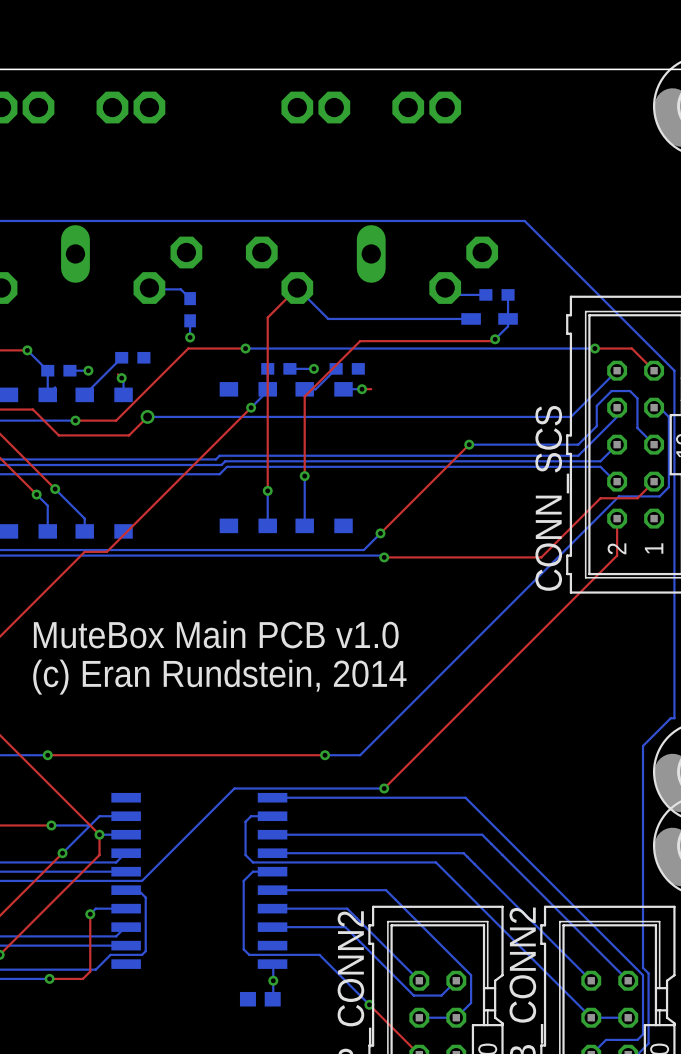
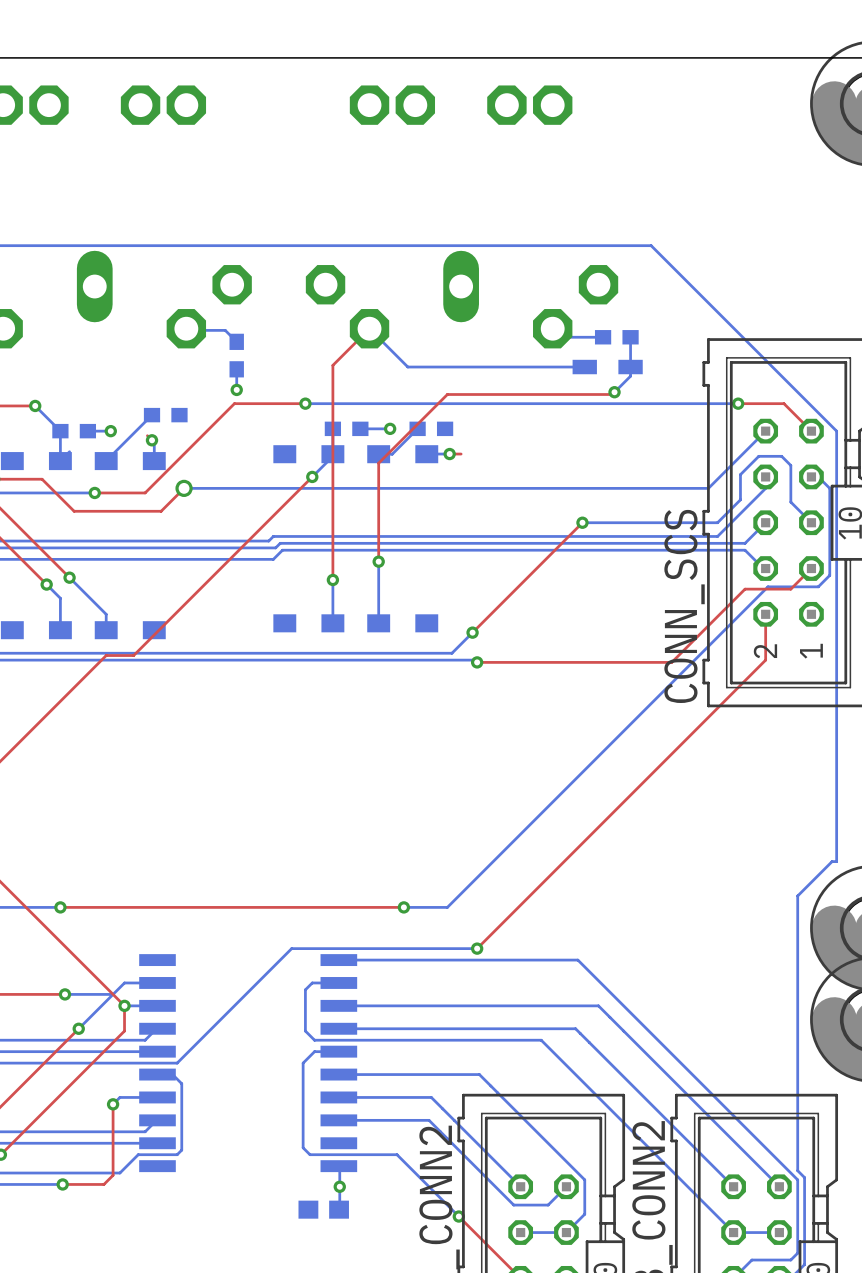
text: MuteBox Main PCB v1.0 (216, 634) -> none
text: (c) Eran Rundstein, 2014 (219, 677) -> none

